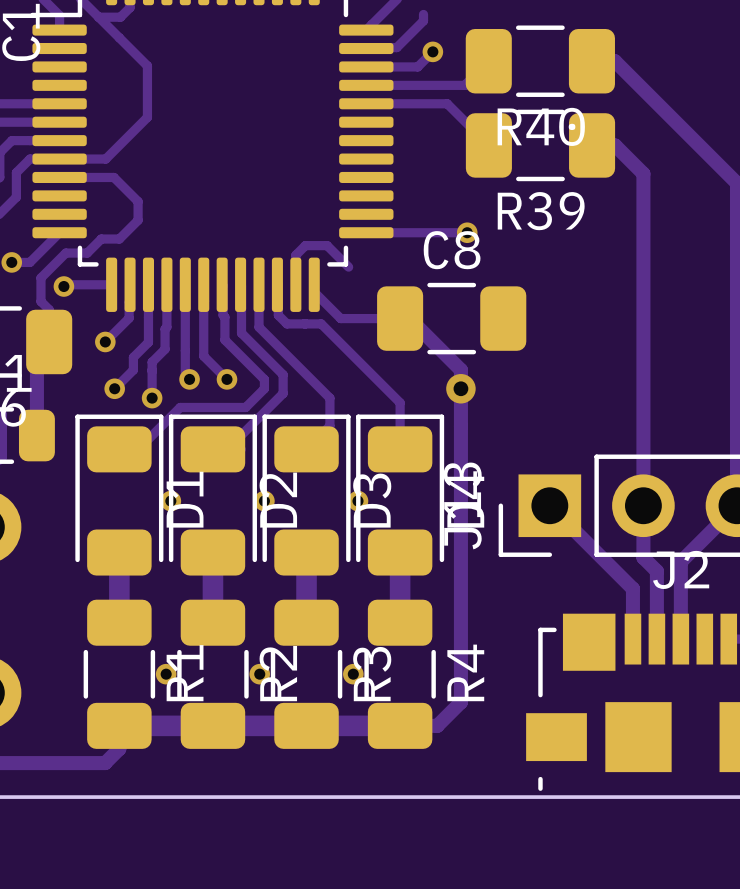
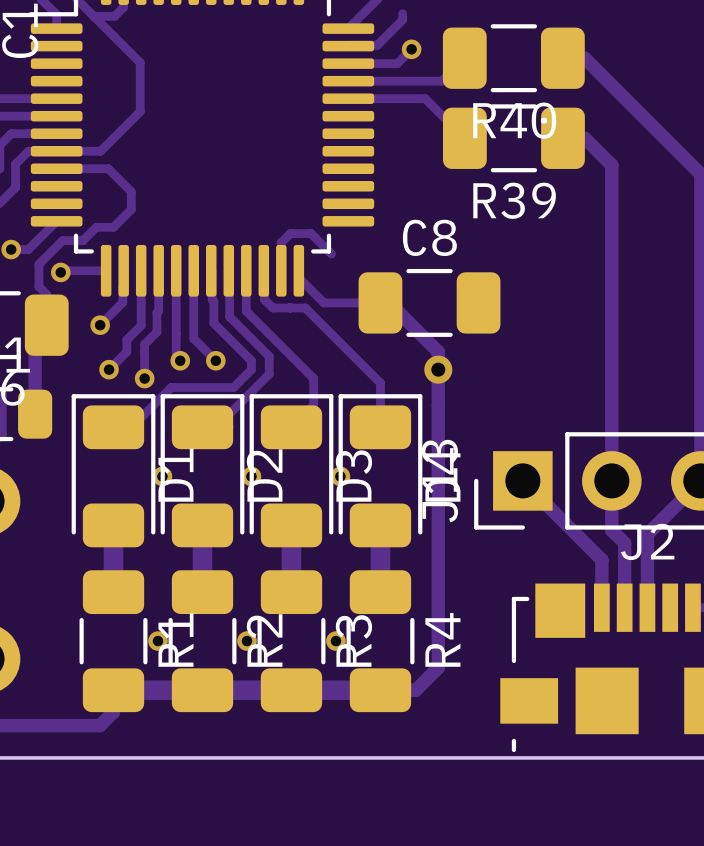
track: (366, 232) (467, 232) -> none
via: (467, 232) -> none

